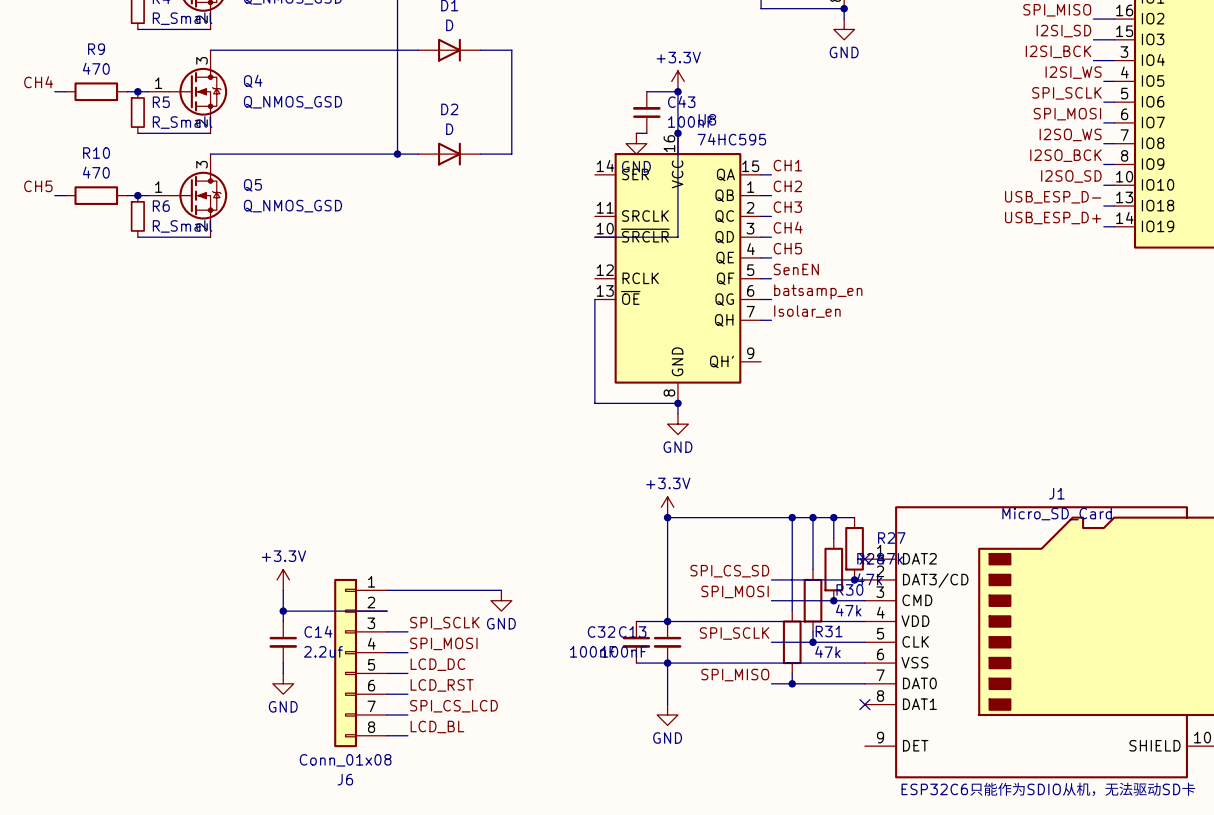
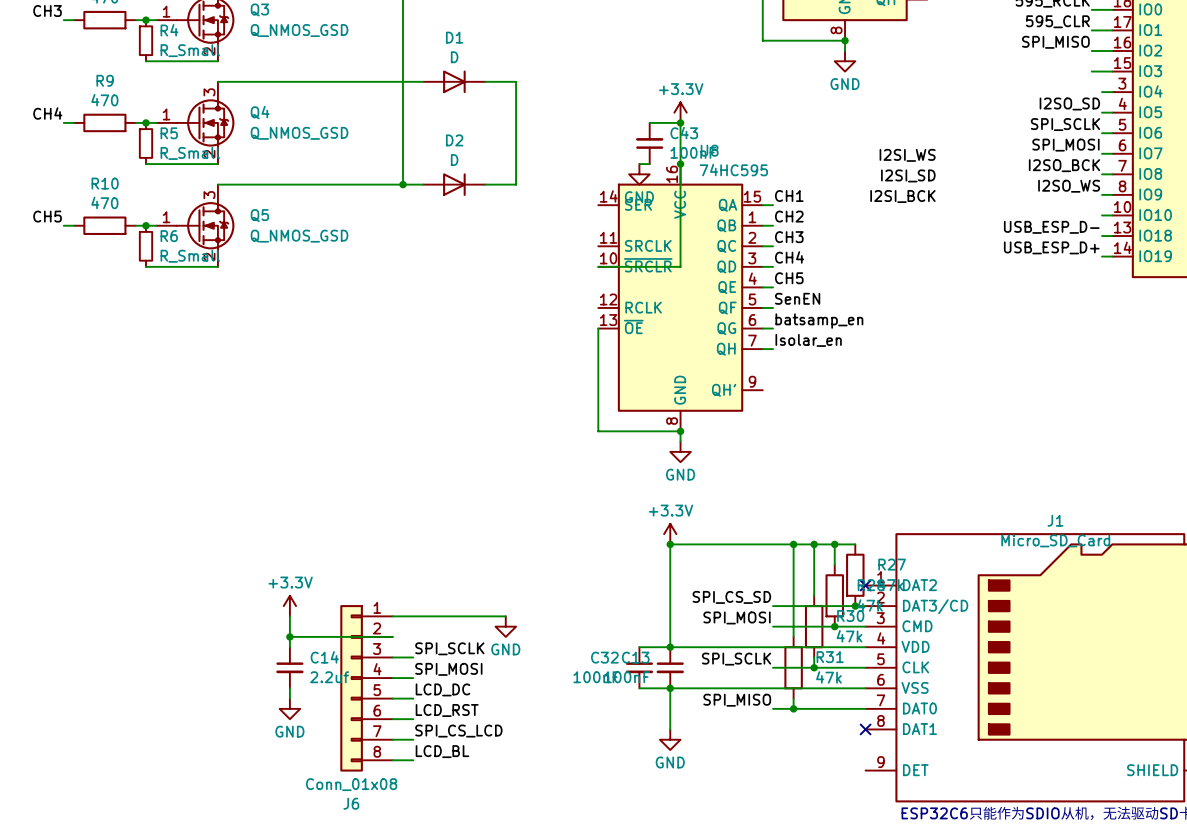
label position: I2SI_SD (1063, 31) -> I2SI_SD (908, 175)
label position: I2SI_BCK (1058, 51) -> I2SI_BCK (902, 196)
wire: (1093, 60) (1103, 60) -> none
label: I2SI_WS (1073, 72) -> I2SO_SD (1069, 103)
label: none -> I2SI_WS (907, 155)
label: I2SO_WS (1070, 134) -> I2SO_BCK (1064, 165)
label: I2SO_BCK (1065, 155) -> I2SO_WS (1069, 186)
label: I2SO_SD (1071, 176) -> none

